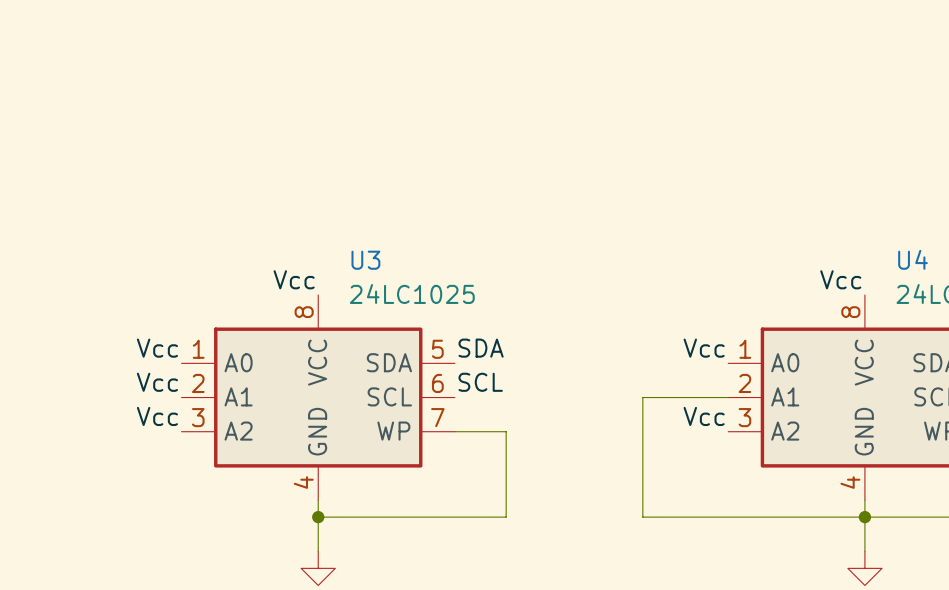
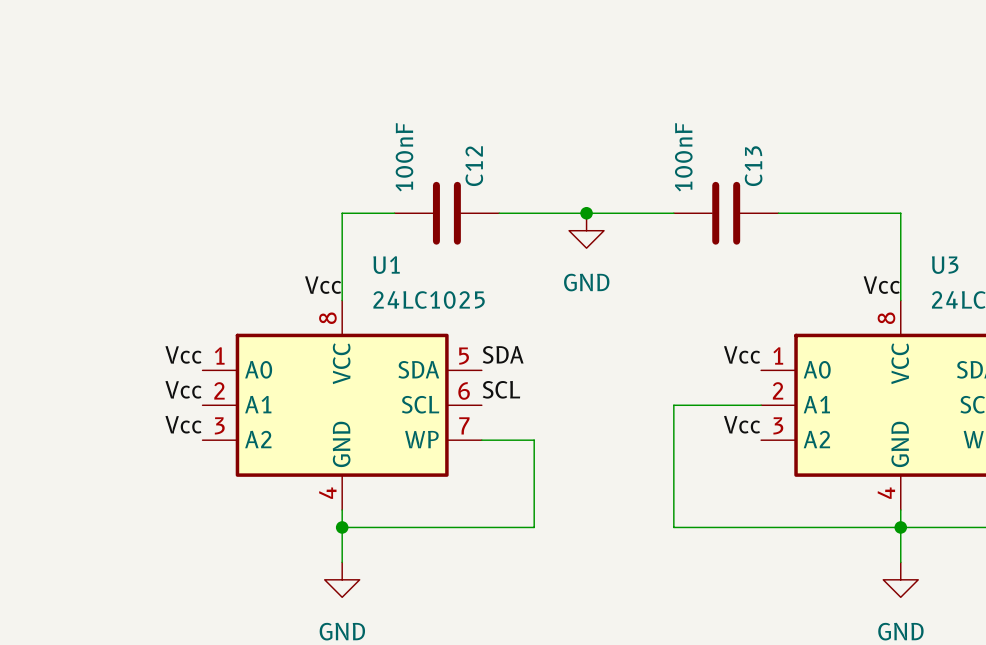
wire: none -> (394, 213) (342, 213) (342, 300)
C12: none -> 100nF (446, 213)
wire: none -> (499, 213) (673, 213)
junction: none -> (586, 213)
C13: none -> 100nF (726, 213)
wire: none -> (778, 213) (900, 213) (900, 300)
power symbol: none -> GND (586, 230)
U4 name: U4 (913, 259) -> U3 (945, 265)
U3 name: U3 (365, 260) -> U1 (386, 265)

